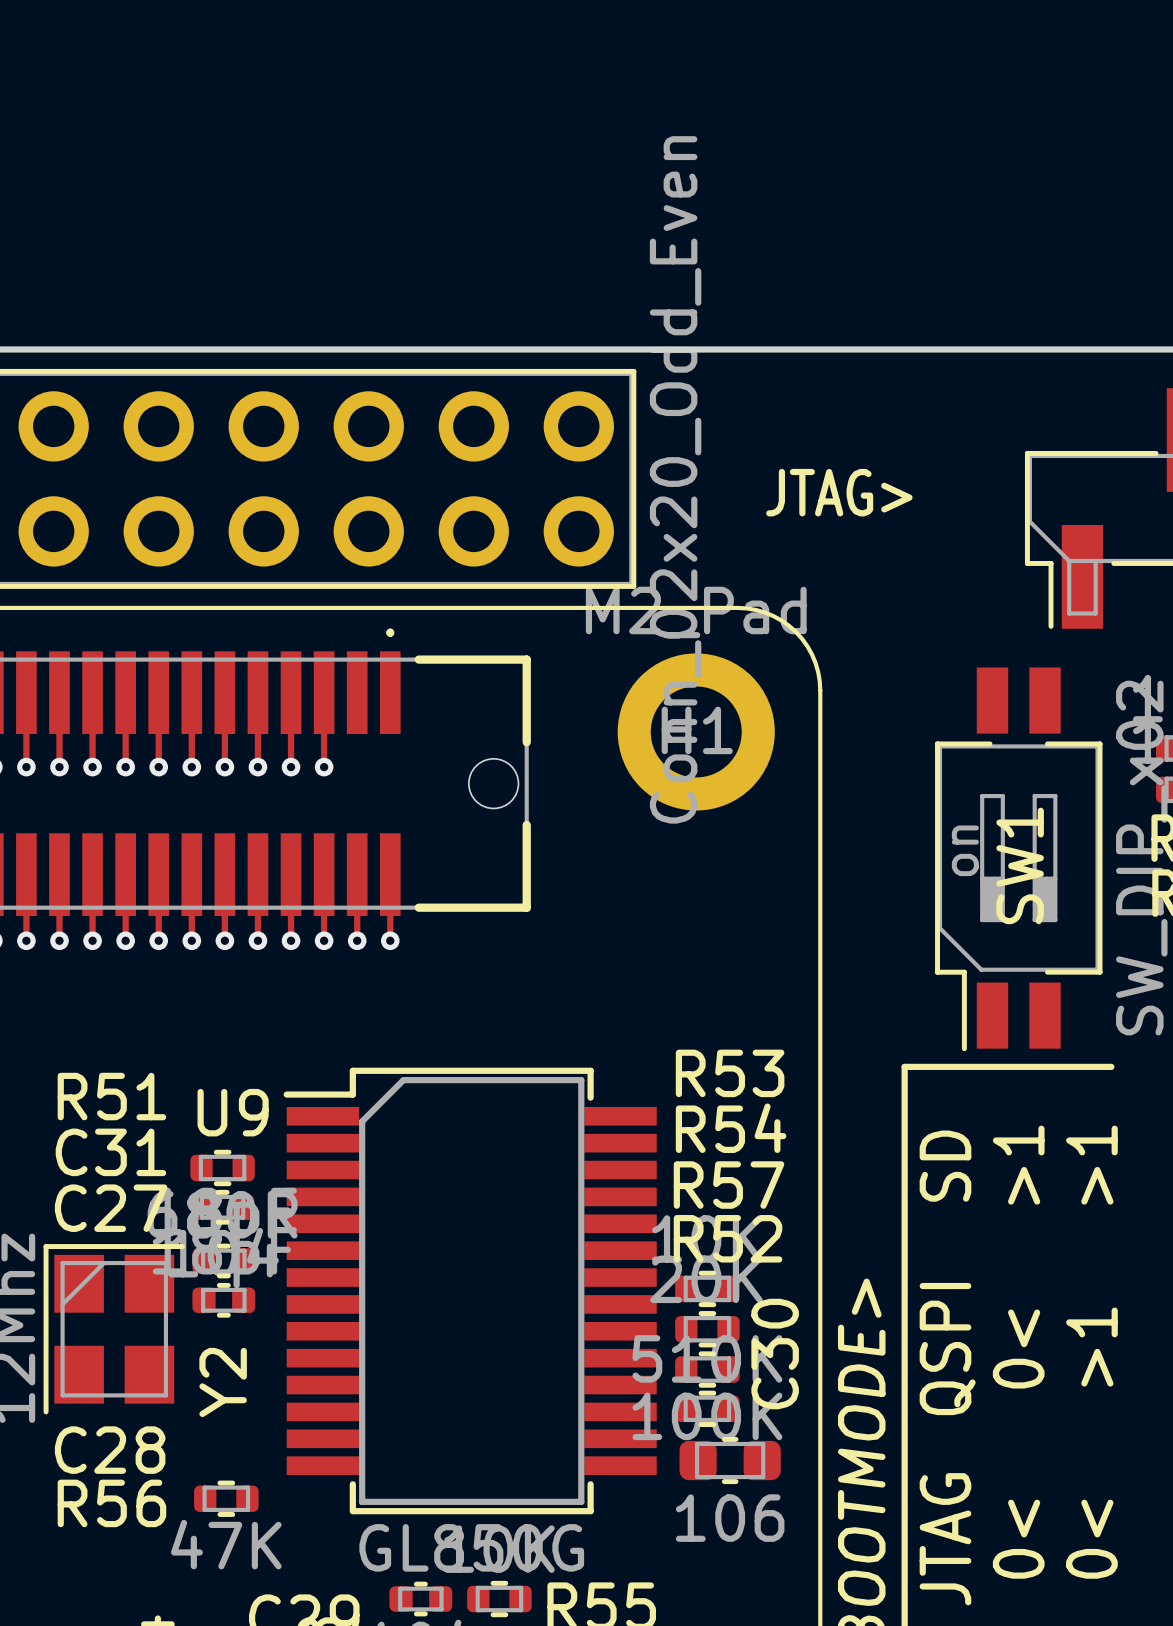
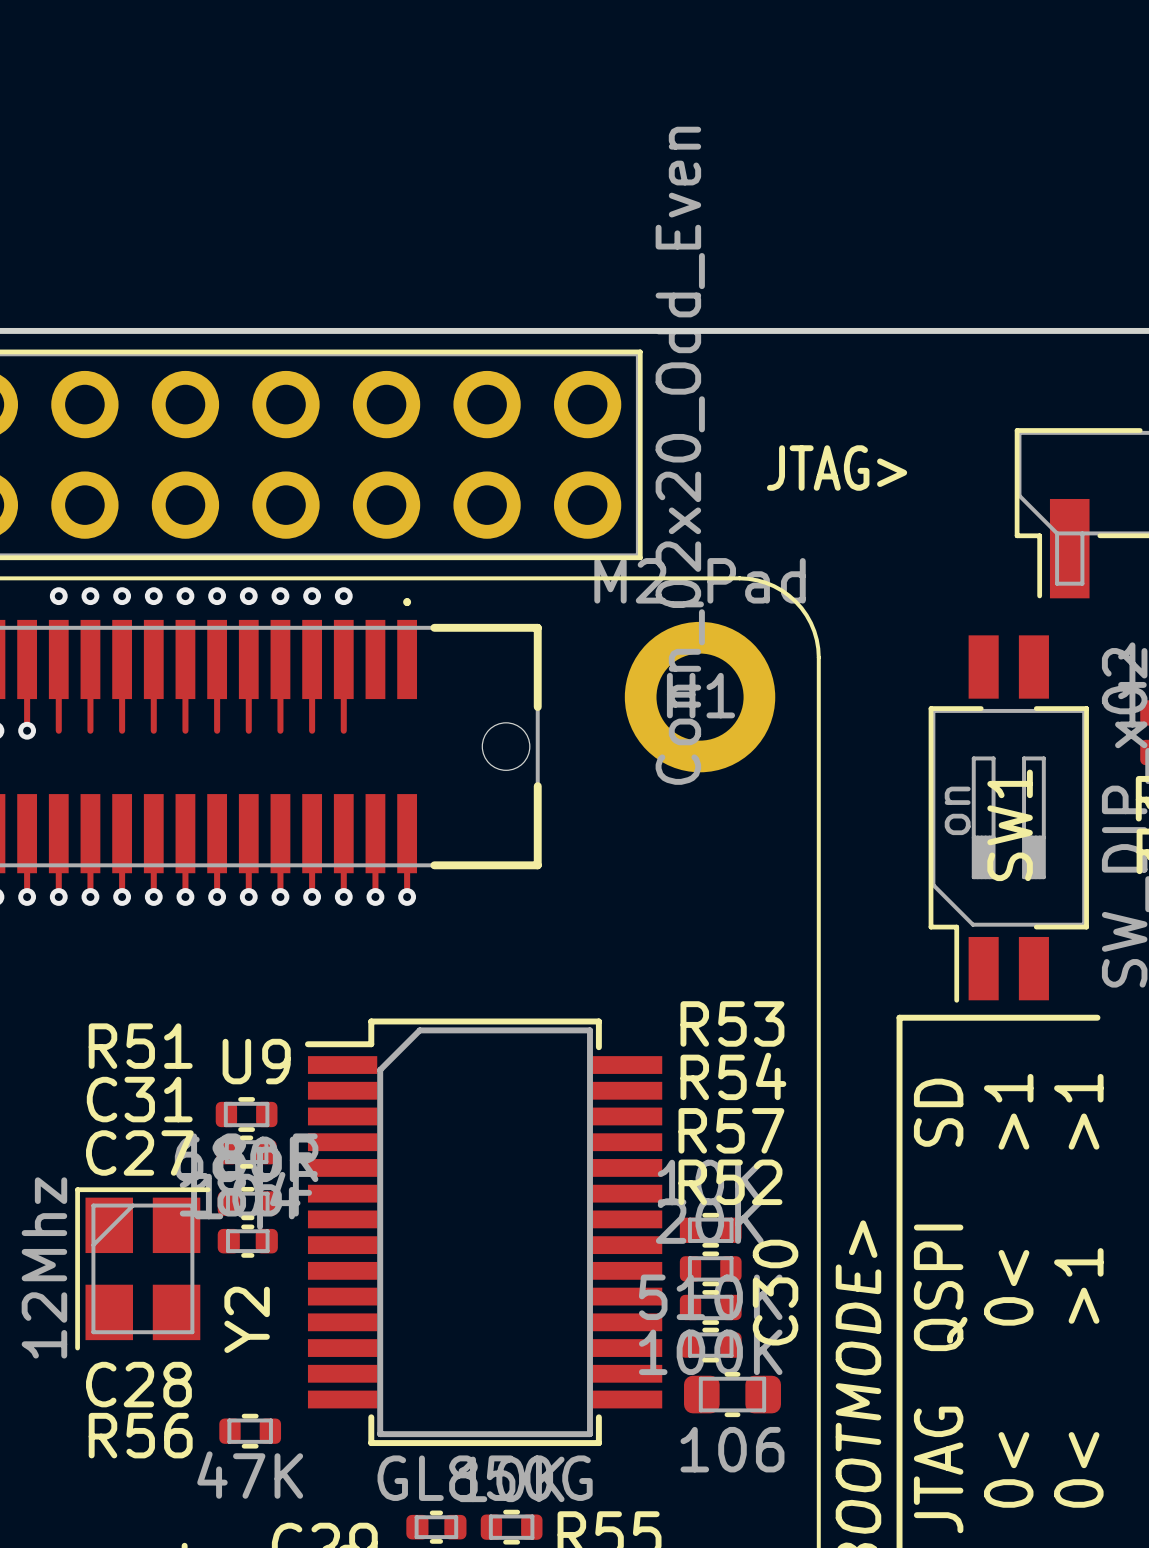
via: none -> (58, 596)
via: none -> (90, 596)
via: none -> (122, 596)
via: none -> (153, 596)
via: none -> (185, 596)
via: none -> (217, 596)
via: none -> (248, 596)
via: none -> (280, 596)
via: none -> (312, 596)
via: none -> (343, 596)
via: (26, 767) -> none
via: (59, 767) -> none
via: (92, 767) -> none
via: (125, 767) -> none
via: (158, 767) -> none
via: (191, 767) -> none
via: (224, 767) -> none
via: (257, 767) -> none
via: (291, 767) -> none
via: (324, 767) -> none

